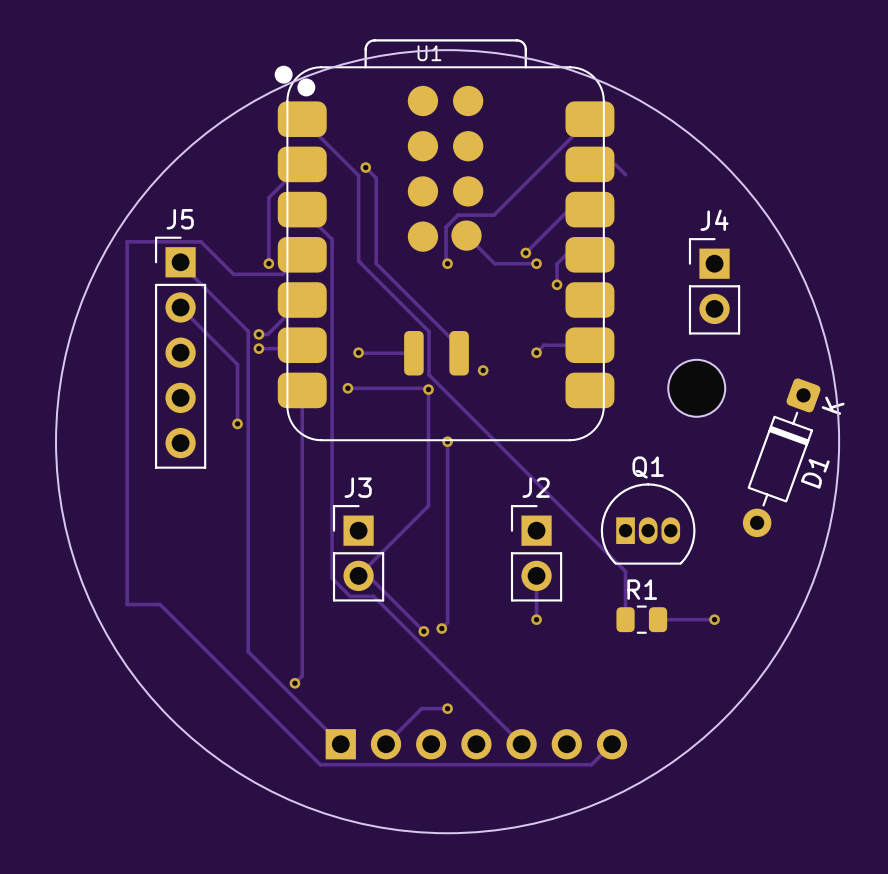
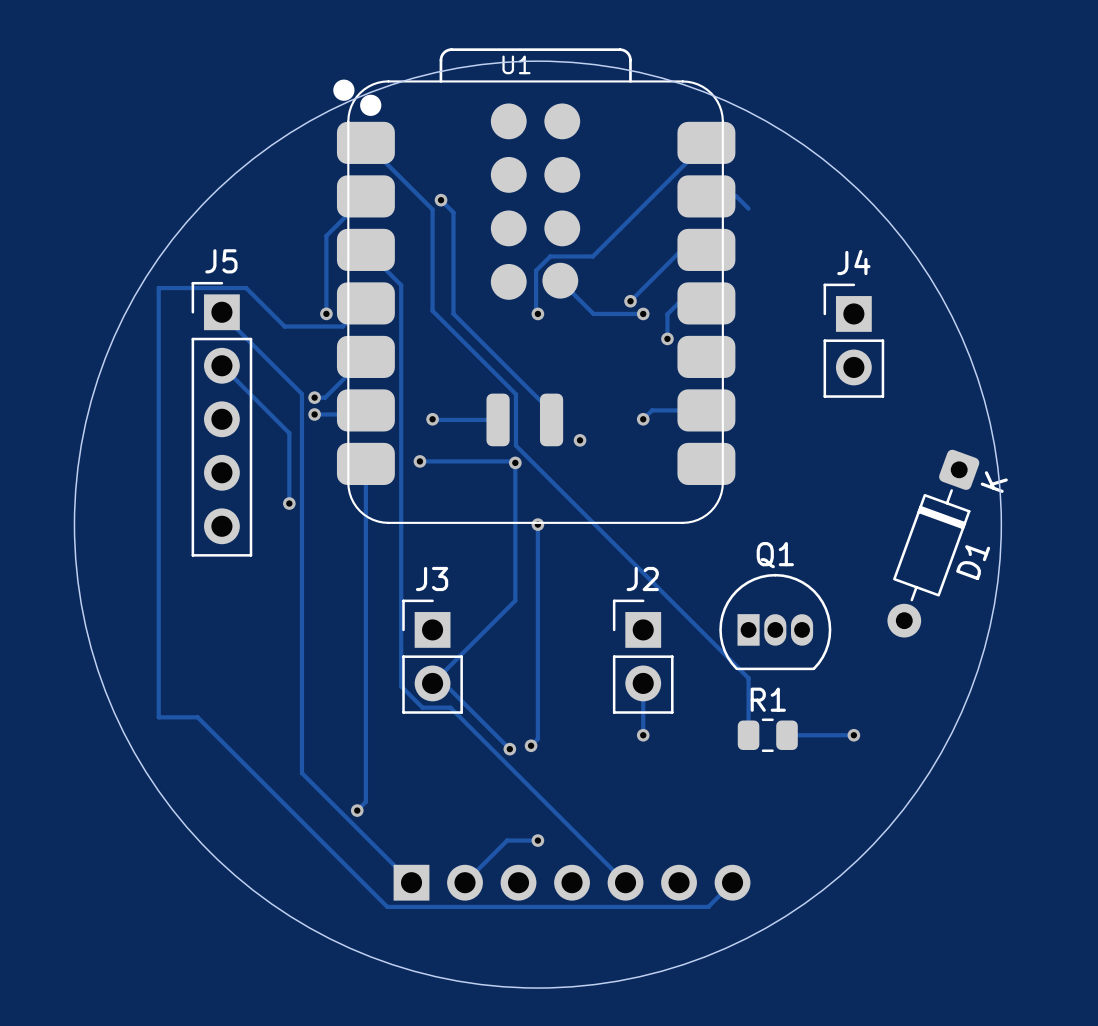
part: (696, 388) -> none

